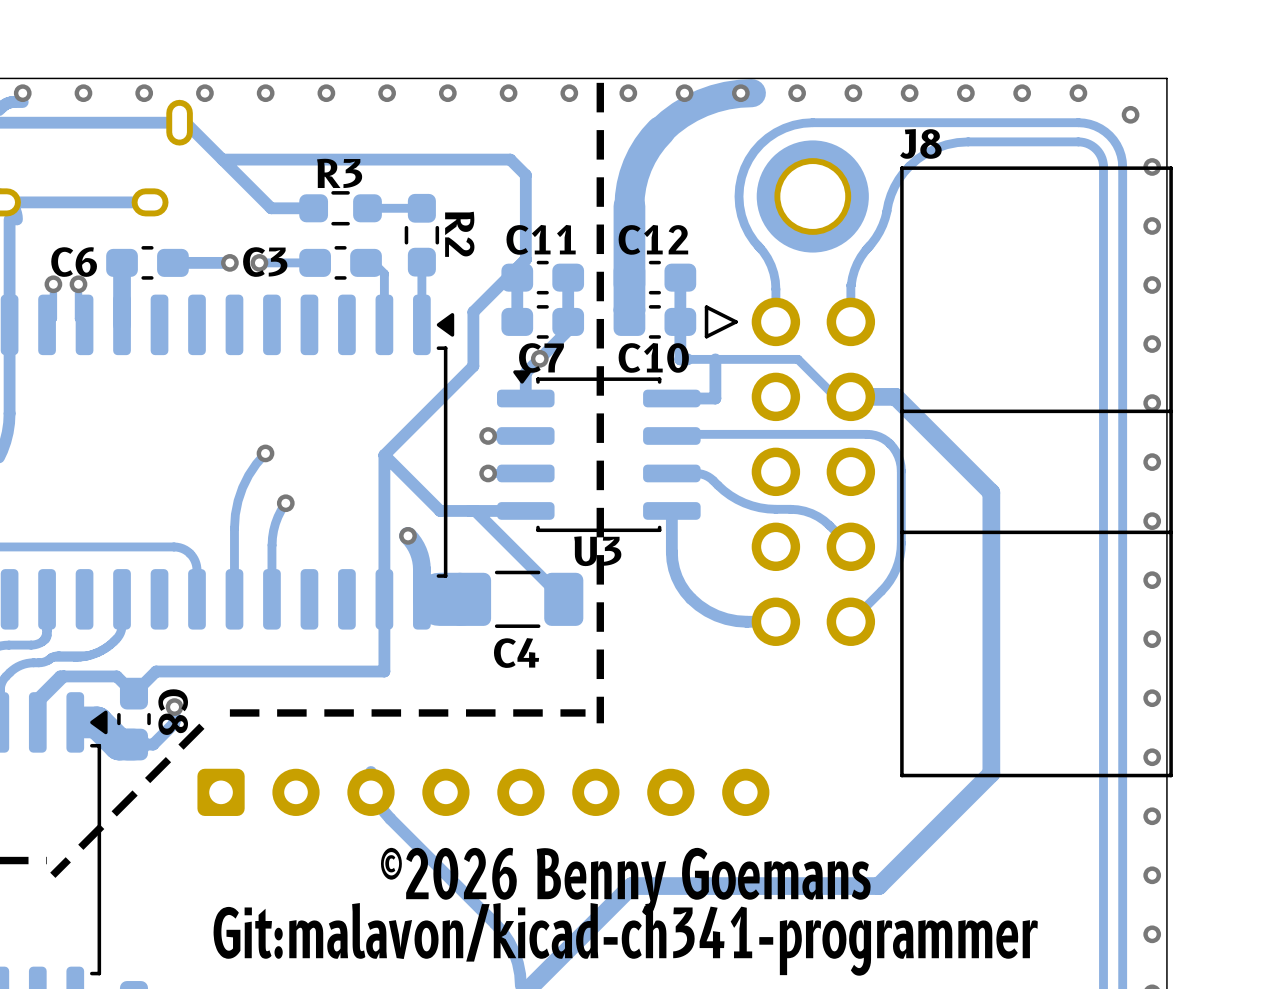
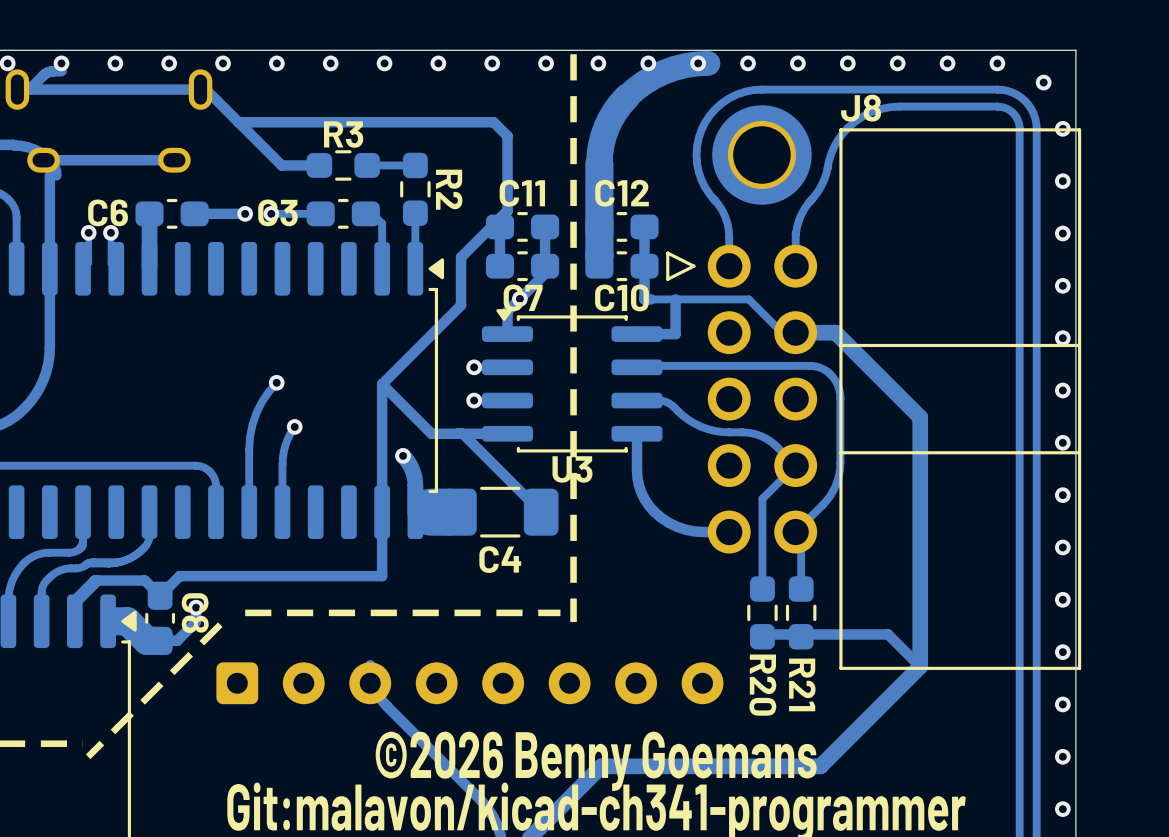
track: none -> (795, 465) (762, 498) (762, 579) (755, 586)
track: none -> (801, 537) (801, 582)
R20: none -> (762, 612)
R21: none -> (801, 612)
track: none -> (755, 634) (888, 634) (920, 666)

